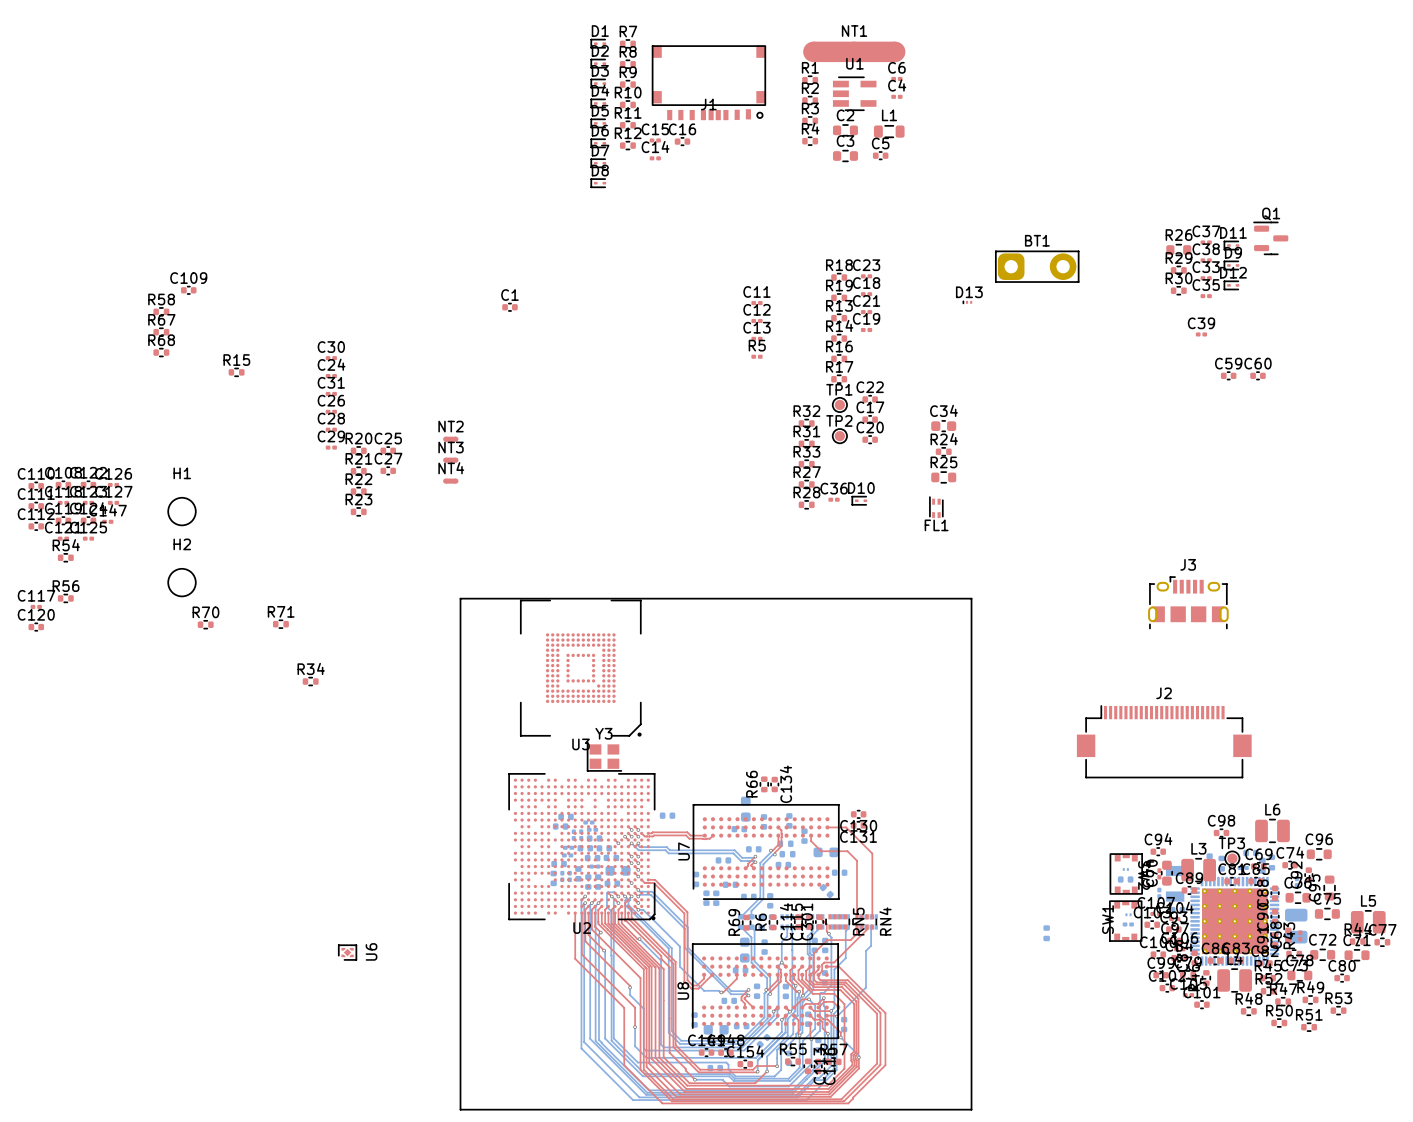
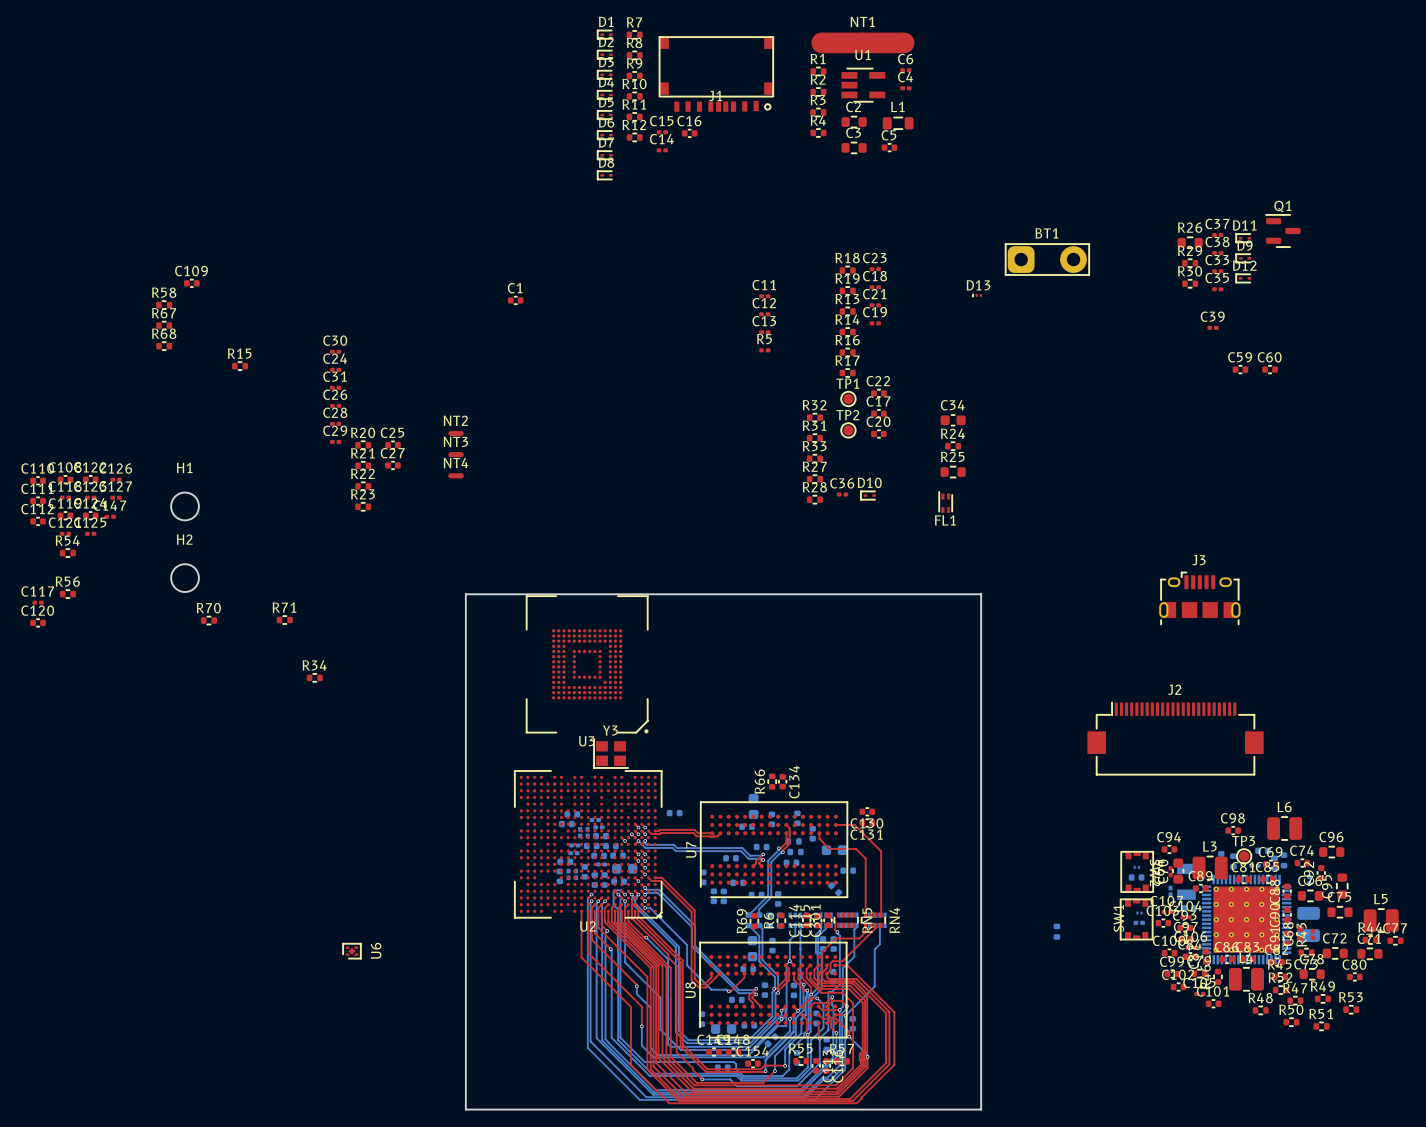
bottom track: none -> (625, 901) (625, 962) (660, 997) (660, 1029) (680, 1050)
top track: none -> (785, 1014) (781, 1018)
via: none -> (781, 1018)
bottom track: (645, 1050) (673, 1050) -> (652, 1050) (657, 1055) (748, 1055) (777, 1026) (786, 1026) (786, 1008)

